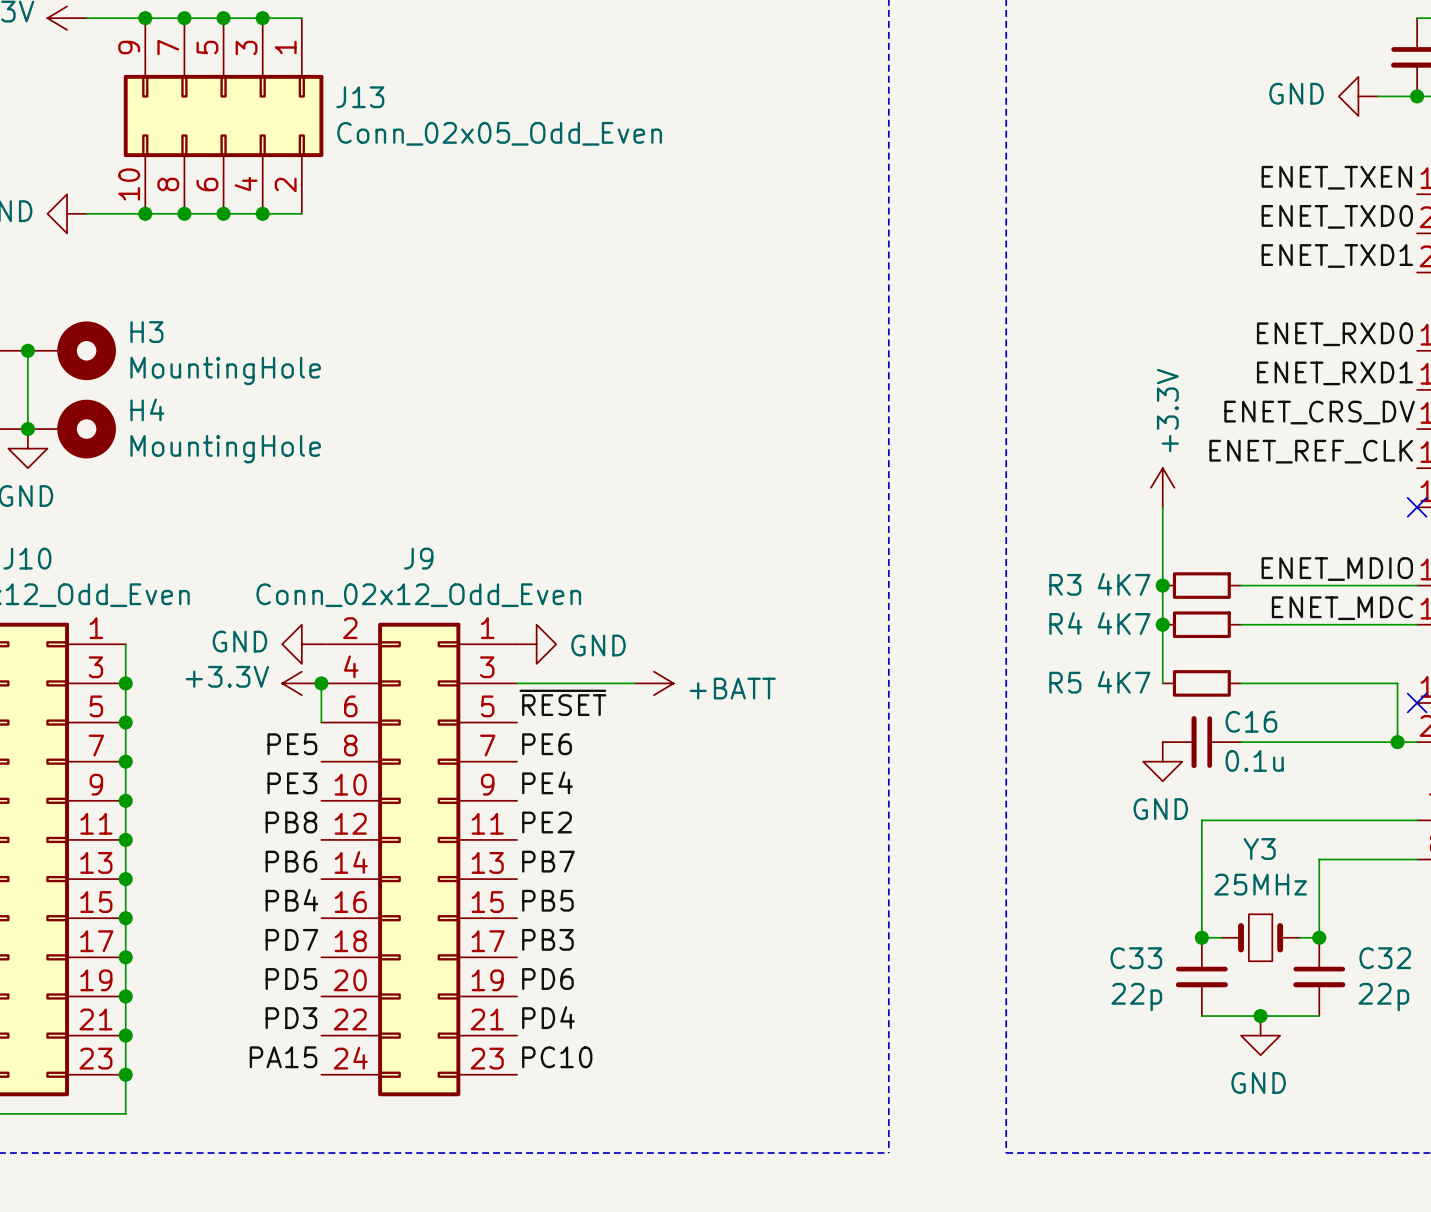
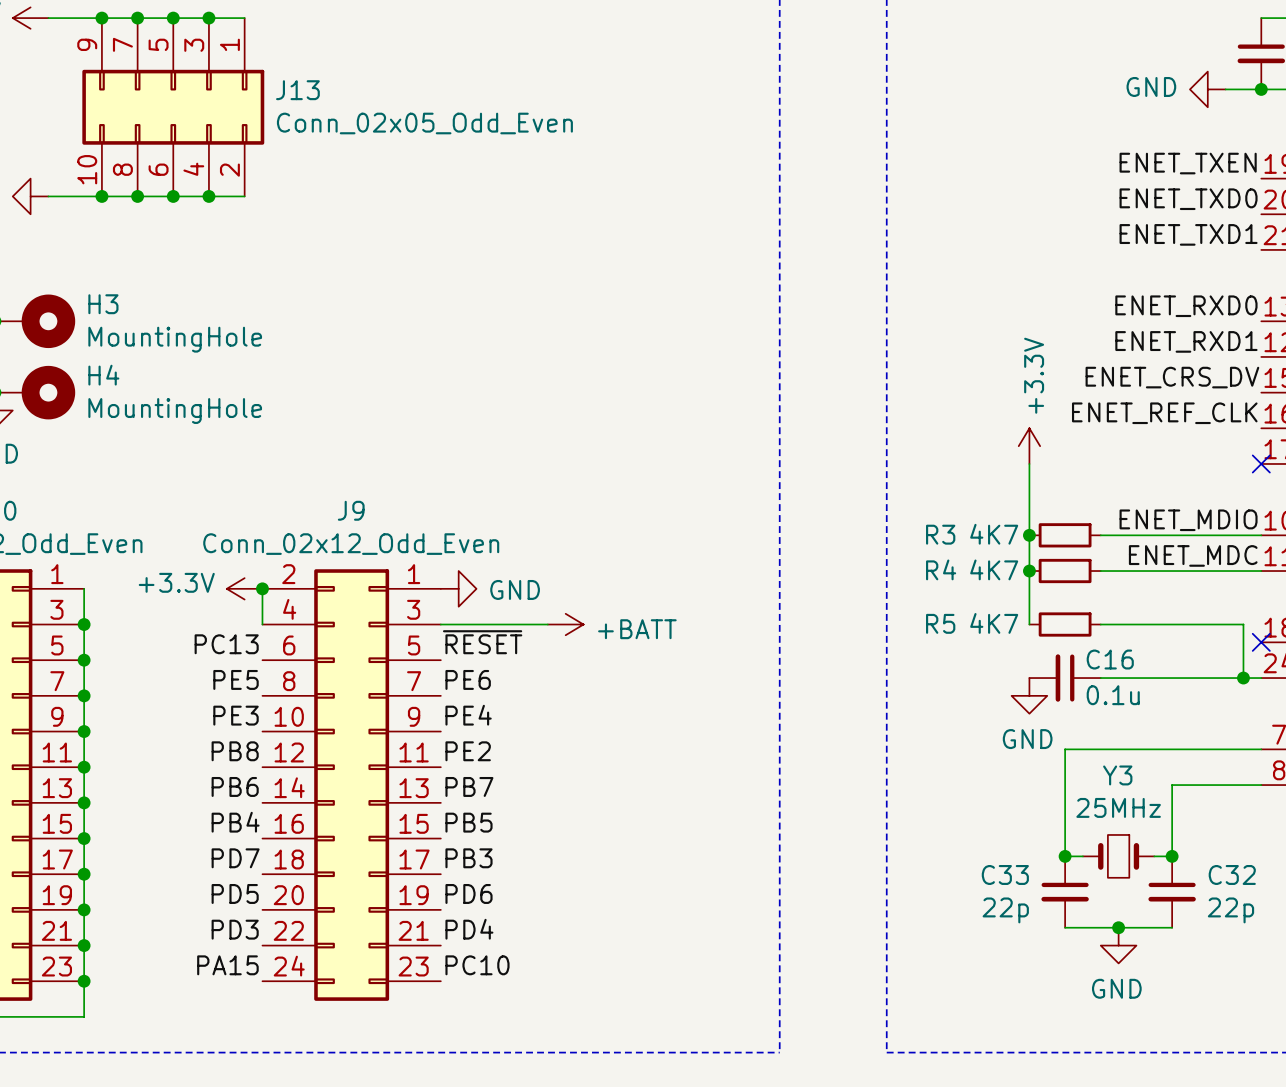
power symbol: GND (301, 644) -> +3.3V (244, 588)
power symbol: +3.3V (301, 683) -> none
wire: (321, 683) (321, 722) -> (262, 624) (262, 588)
junction position: (321, 683) -> (262, 588)
label: none -> PC13 (226, 644)

